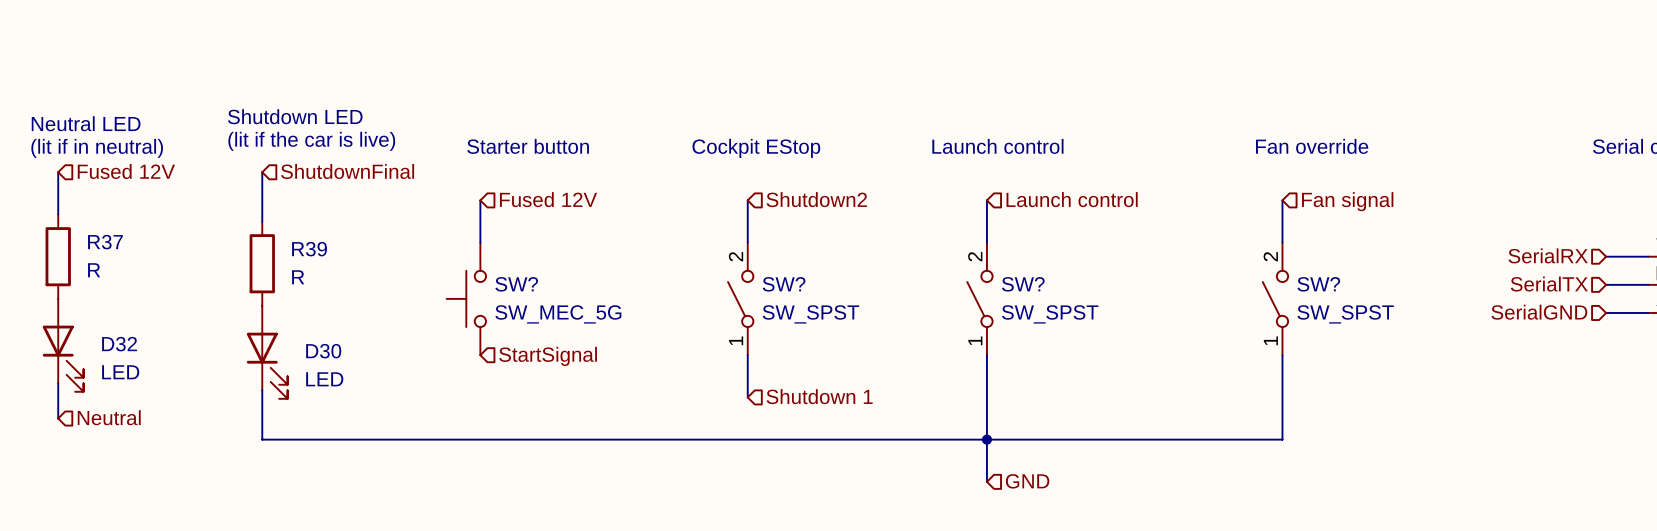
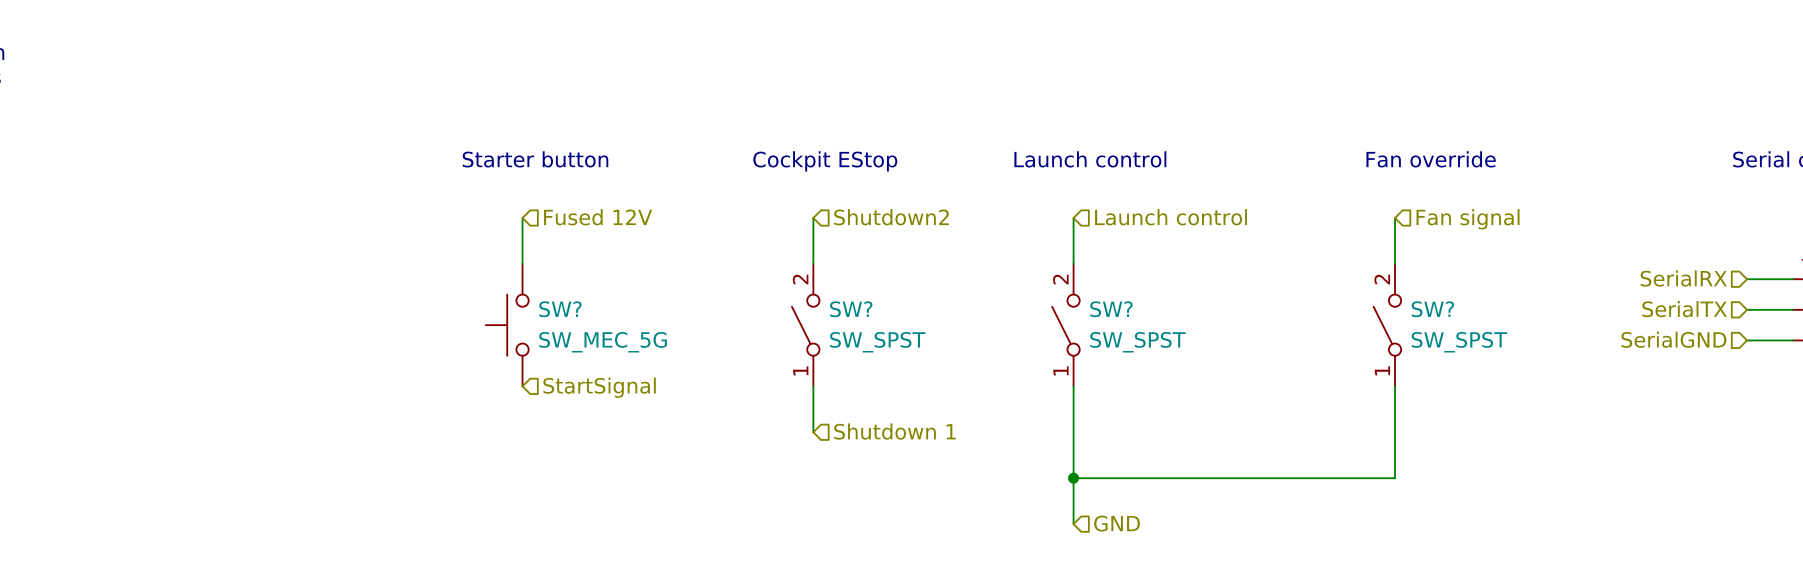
text: Shutdown LED (295, 116) -> none
text: Neutral LED (86, 123) -> none
text: (lit if the car is live) (311, 141) -> none
text position: Starter button (528, 146) -> Starter button (535, 159)
text: (lit if in neutral) (97, 148) -> none
hierarchical label: Fused 12V (126, 171) -> none
hierarchical label: ShutdownFinal (347, 171) -> none
wire: (58, 172) (58, 214) -> none
wire: (262, 172) (262, 221) -> none
R37: R (58, 256) -> none
R39: R (262, 263) -> none
D32: LED (63, 345) -> none
D30: LED (267, 352) -> none
wire: (58, 383) (58, 418) -> none
wire: (262, 390) (262, 439) (986, 439) -> none
hierarchical label: Neutral (109, 417) -> none

